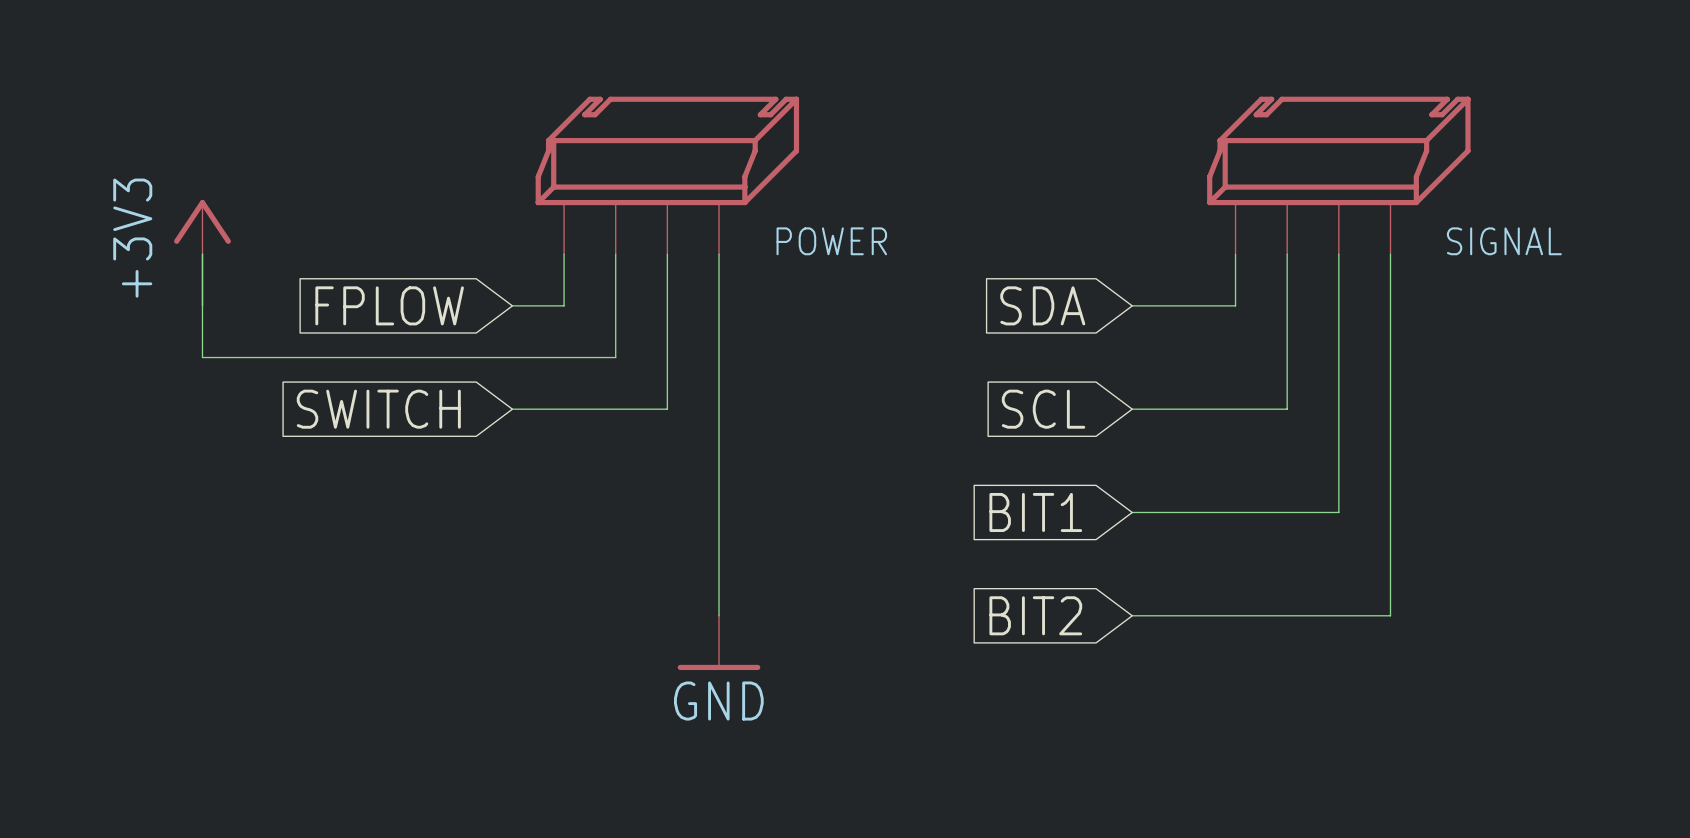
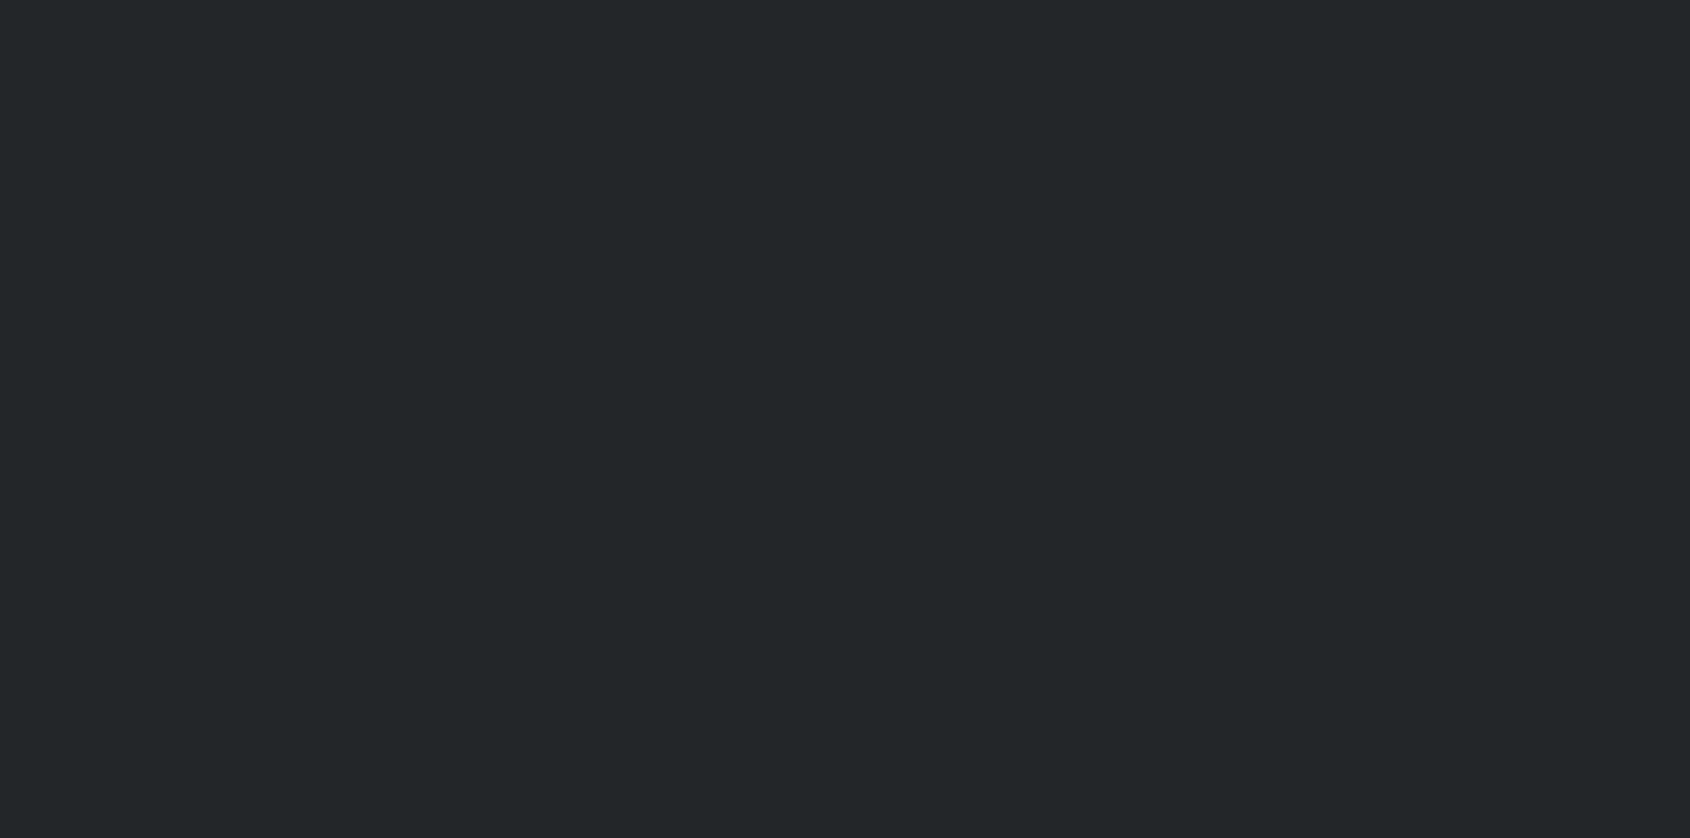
POWER: (667, 175) -> none
SIGNAL: (1338, 175) -> none
power symbol: +3V3 (202, 227) -> none
wire: (202, 254) (202, 357) (615, 357) (615, 254) -> none
wire: (564, 254) (564, 305) (512, 305) -> none
wire: (667, 254) (667, 409) (512, 409) -> none
wire: (719, 254) (719, 615) -> none
wire: (1235, 254) (1235, 305) (1132, 305) -> none
wire: (1287, 254) (1287, 409) (1132, 409) -> none
wire: (1338, 254) (1338, 512) (1132, 512) -> none
wire: (1390, 254) (1390, 615) (1132, 615) -> none
global label: FPLOW (389, 305) -> none
global label: SDA (1042, 305) -> none
global label: SWITCH (378, 409) -> none
global label: SCL (1043, 409) -> none
global label: BIT1 (1035, 512) -> none
global label: BIT2 (1035, 615) -> none
power symbol: GND (719, 642) -> none

